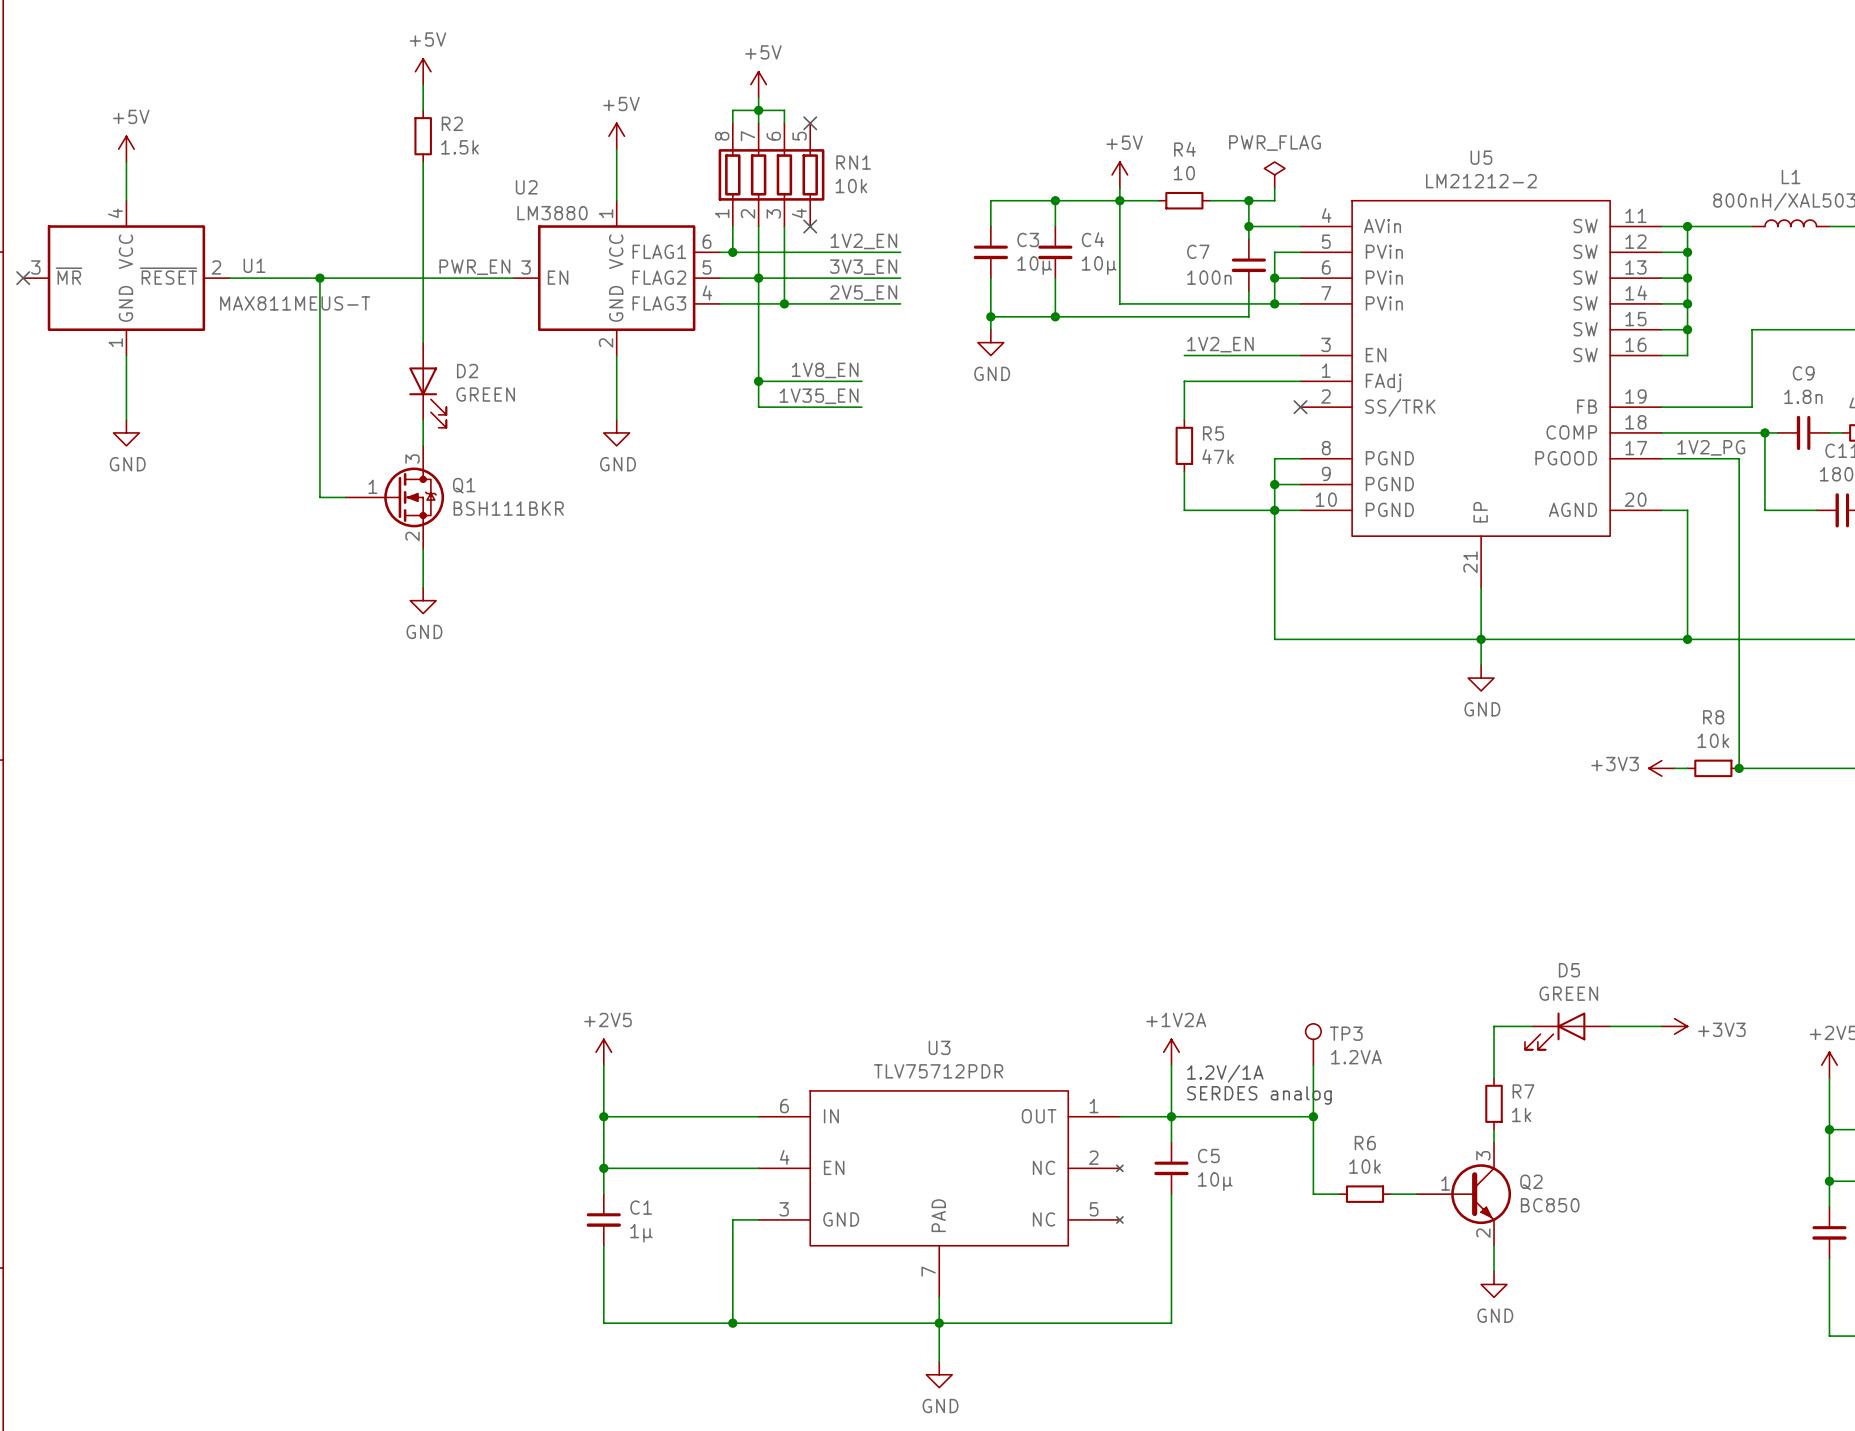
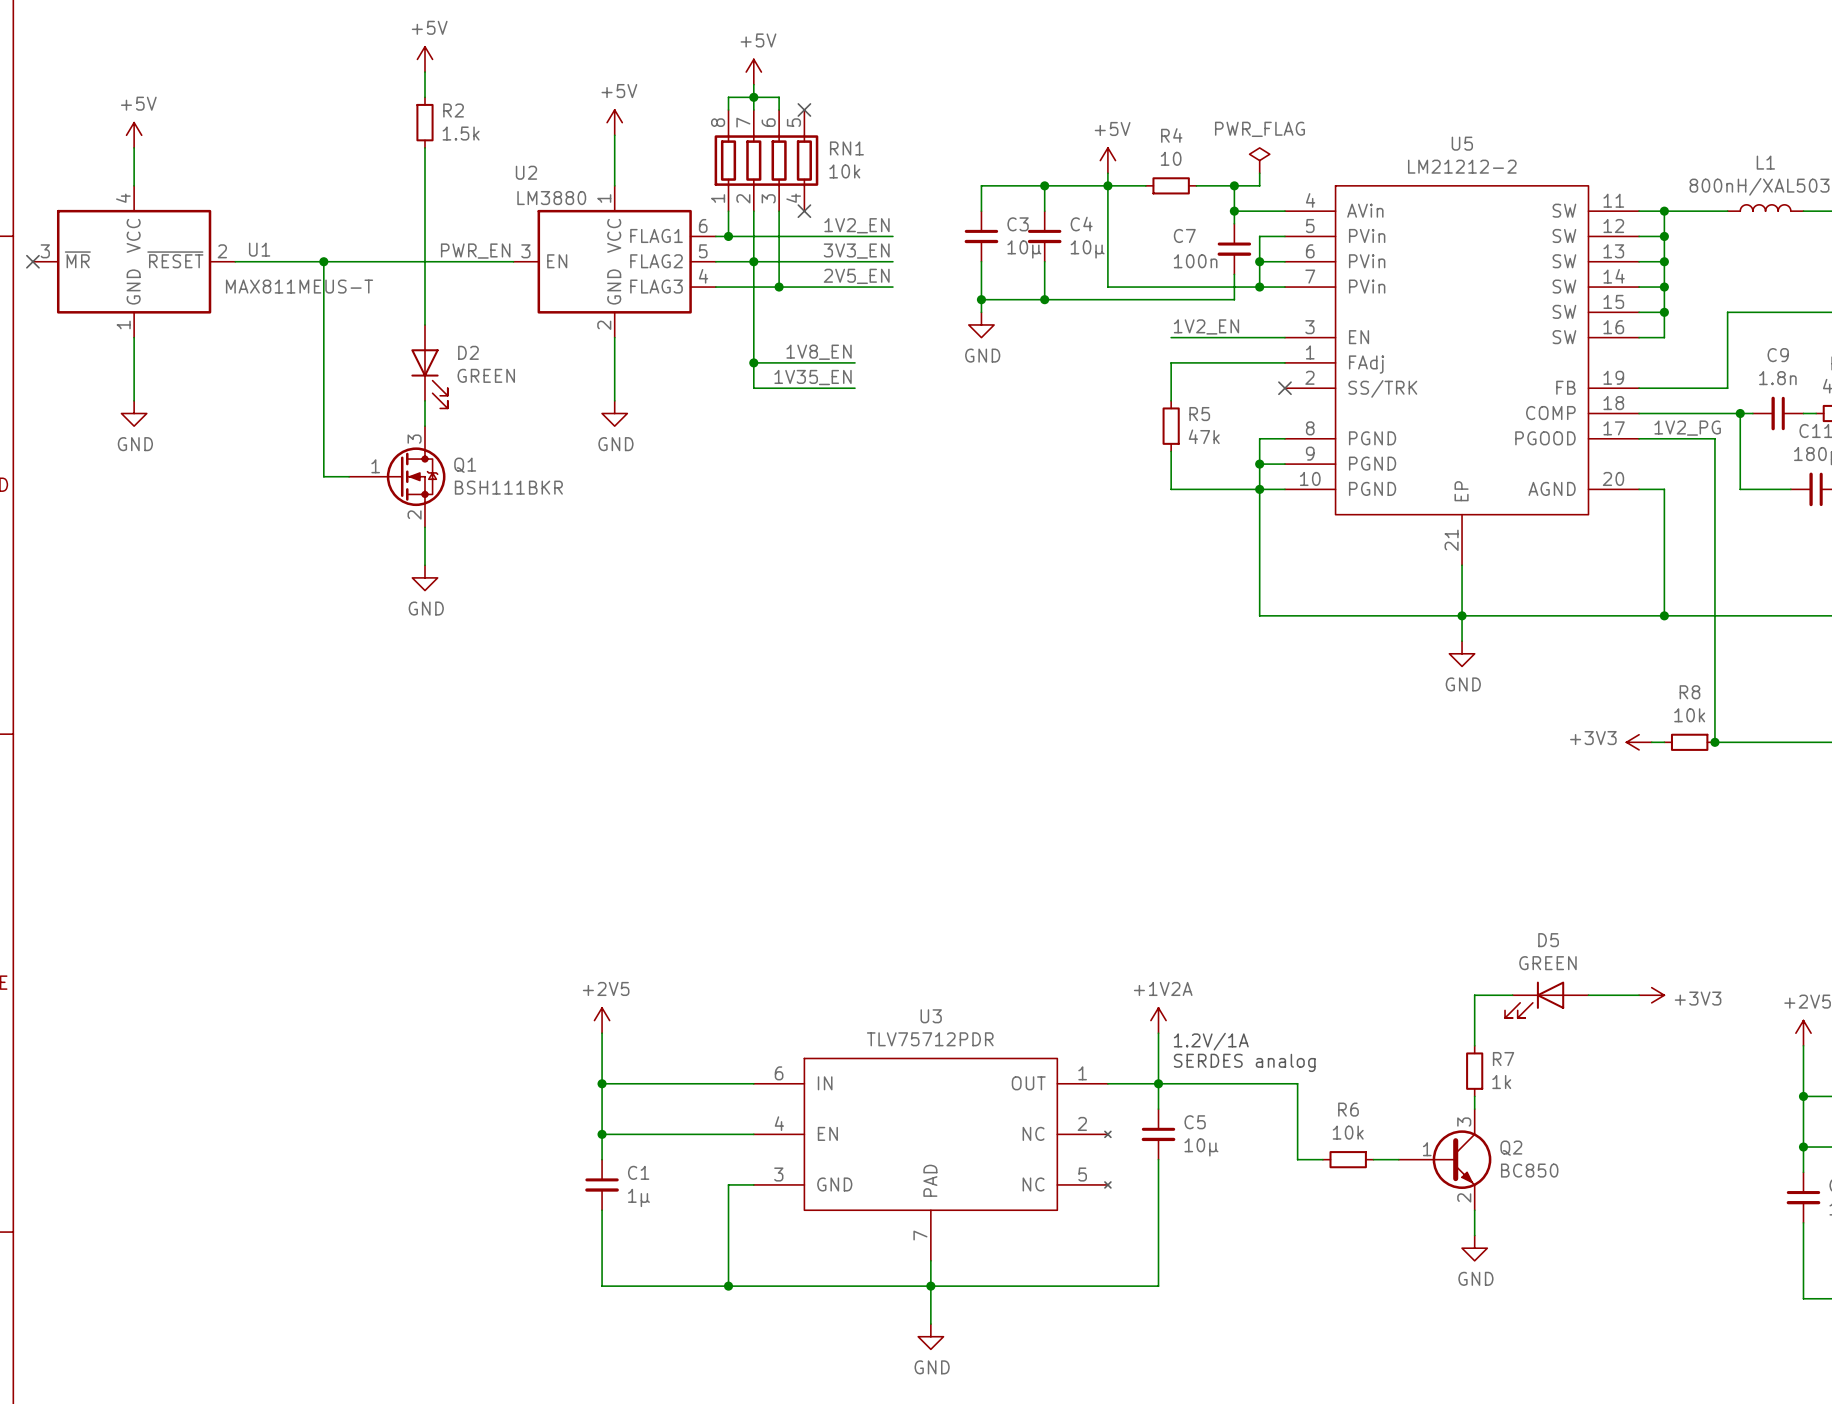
TP3: 1.2VA (1313, 1044) -> none
wire: (1313, 1065) (1313, 1116) -> none
junction: (1313, 1116) -> none

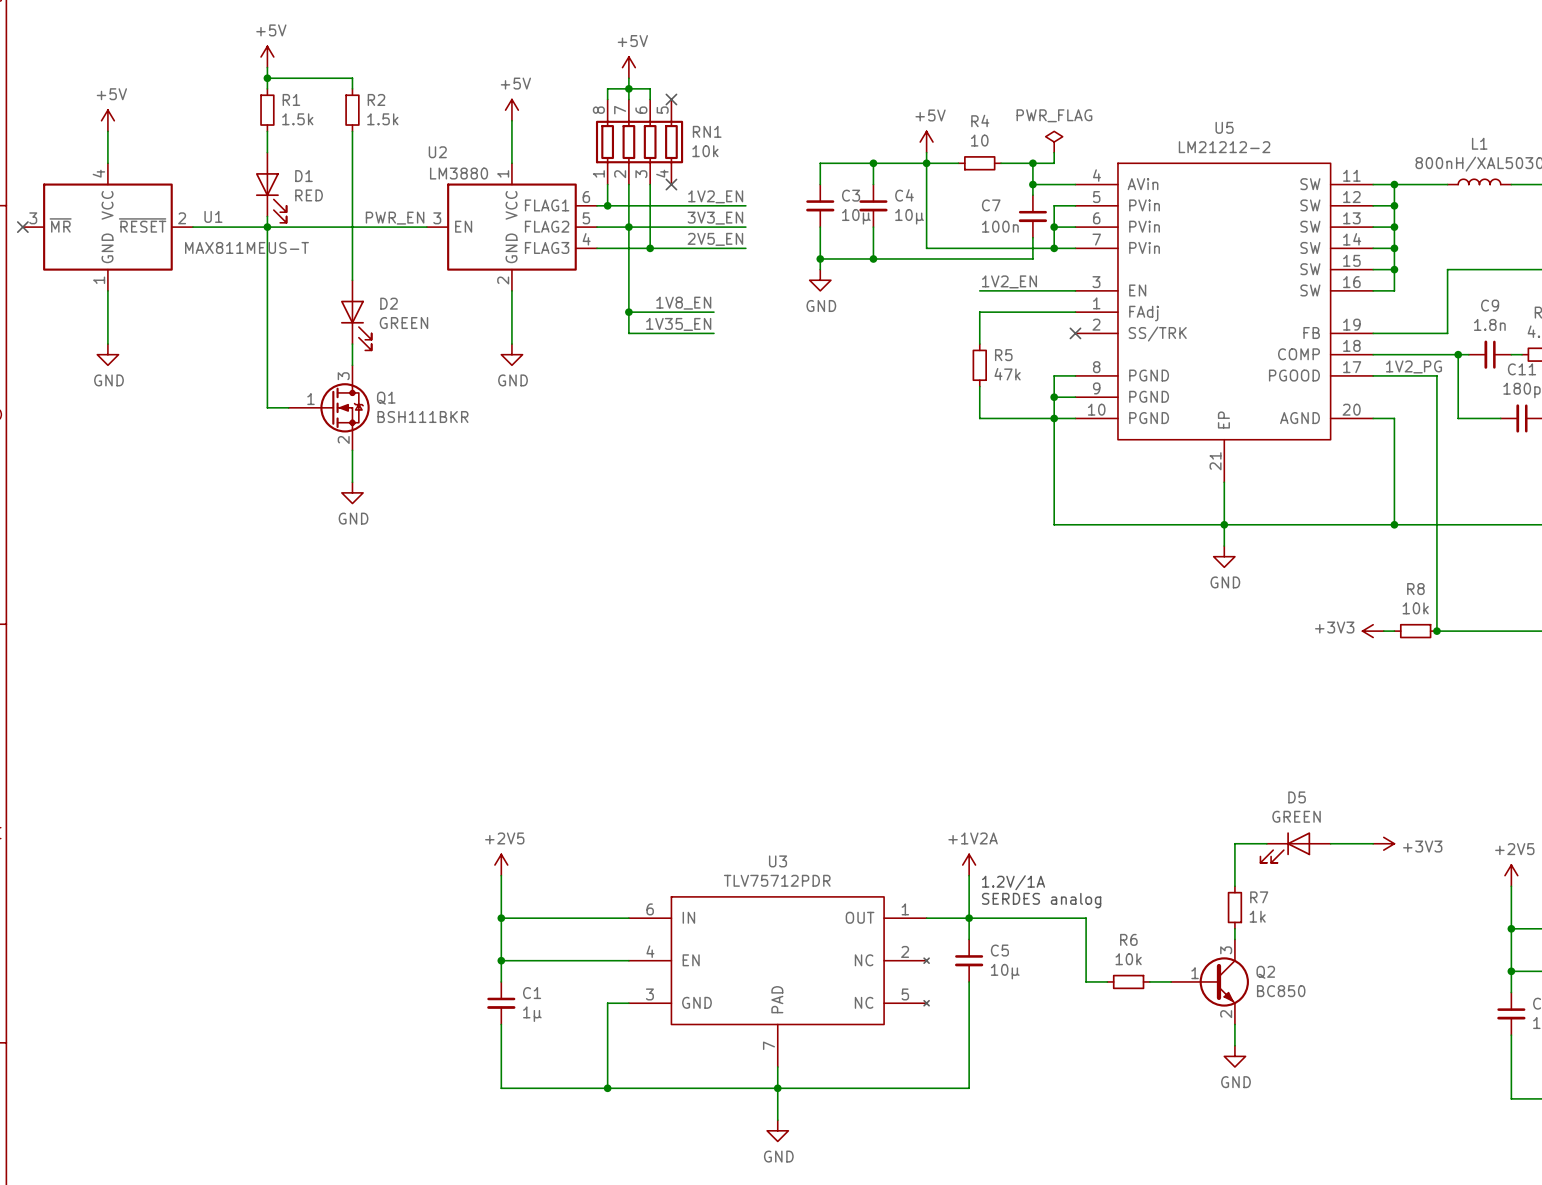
power symbol position: +5V (424, 59) -> +5V (267, 56)
wire: none -> (267, 67) (267, 88)
wire: (424, 72) (424, 84) -> (267, 78) (352, 78)
junction: none -> (267, 78)
R1: none -> 1.5k (267, 110)
wire: none -> (267, 131) (267, 152)
D1: none -> RED (271, 187)
wire: none -> (267, 216) (267, 227)

